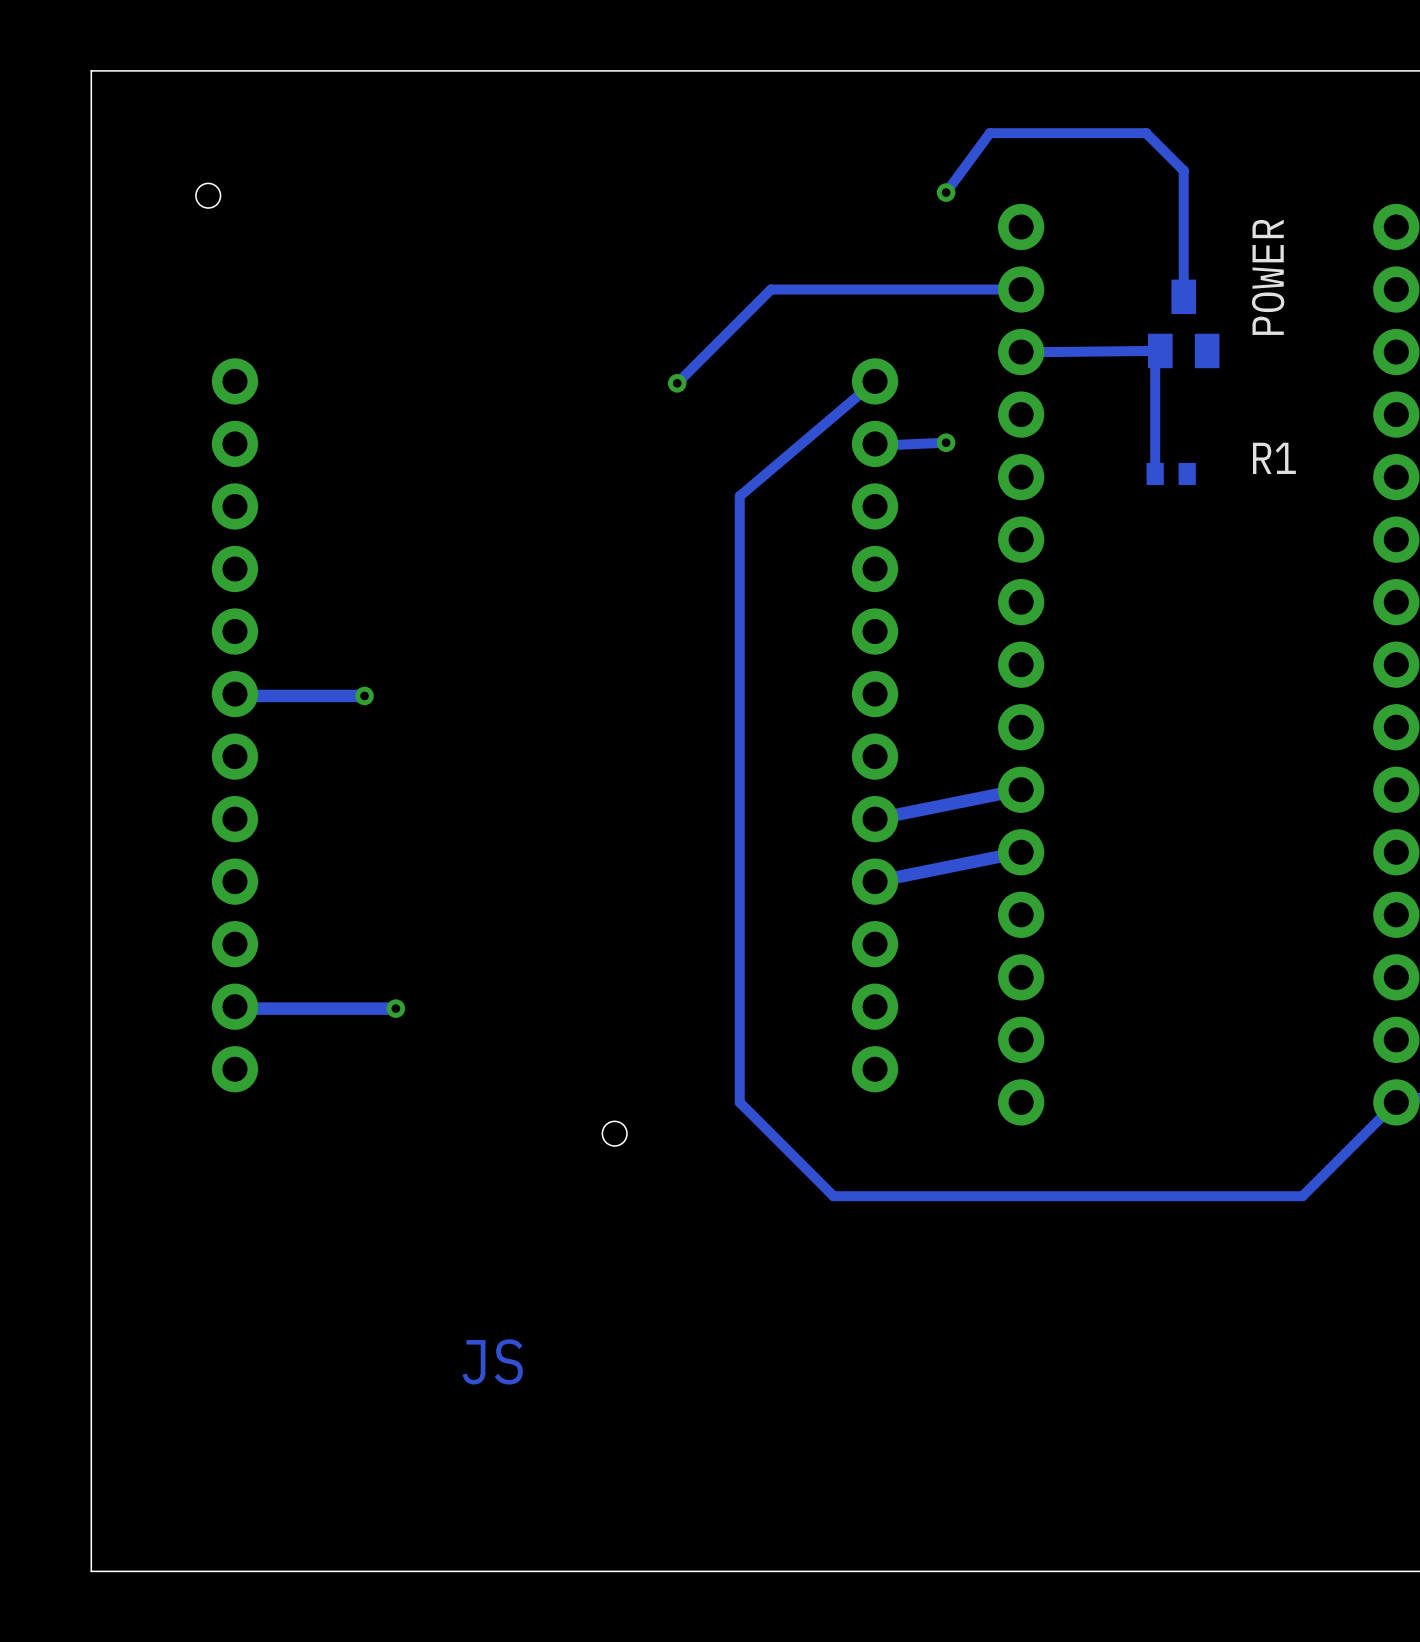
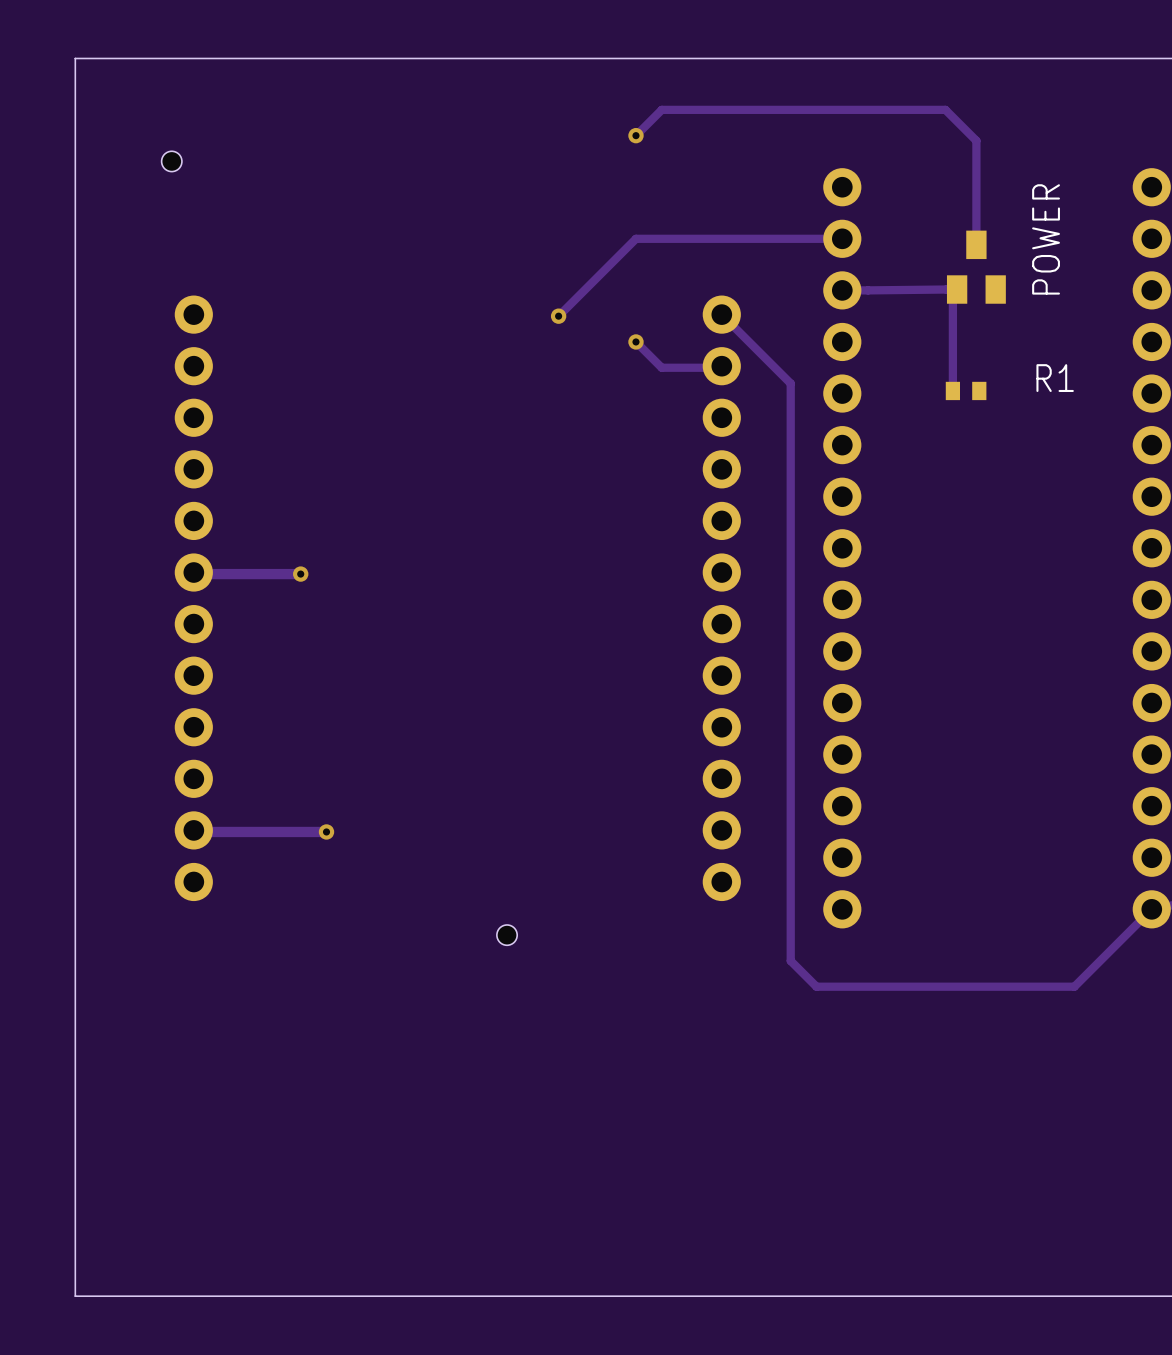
track: (989, 133) (946, 192) -> (816, 109) (661, 109) (635, 135)
via: none -> (635, 135)
via: (946, 192) -> none
track: (875, 381) (739, 496) (739, 1102) (833, 1196) (989, 1196) -> (721, 314) (790, 383) (790, 960) (816, 986)
via: none -> (635, 341)
track: (946, 442) (873, 445) -> (635, 341) (661, 367) (720, 367)
via: (946, 442) -> none
track: (1021, 789) (875, 819) -> none
track: (1021, 852) (875, 881) -> none
text: JS (492, 1361) -> none

